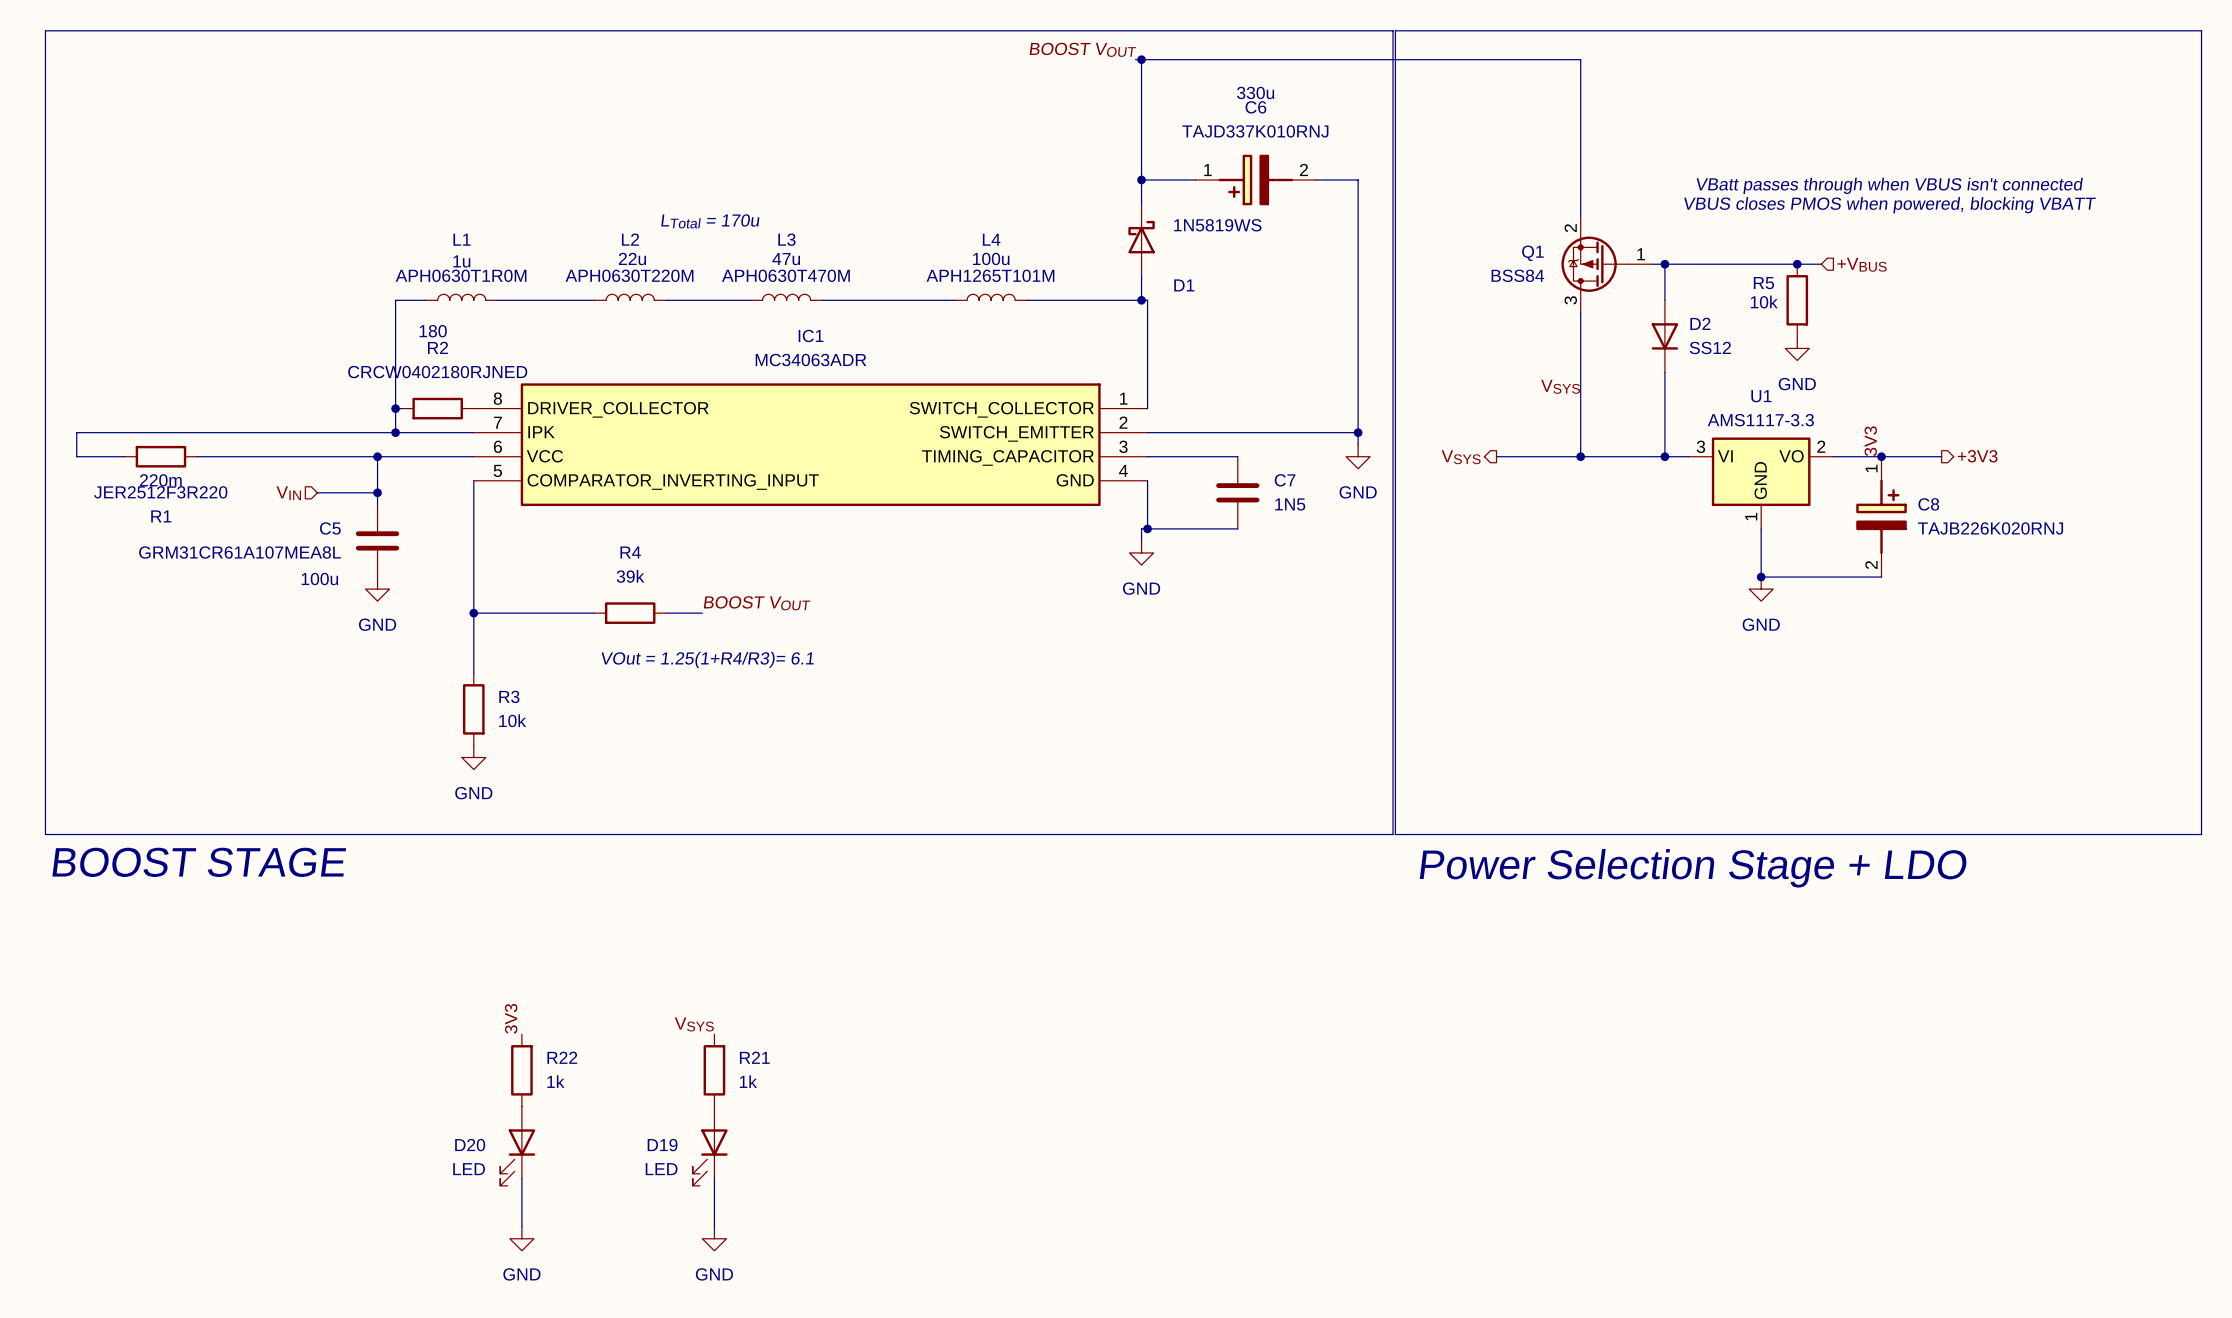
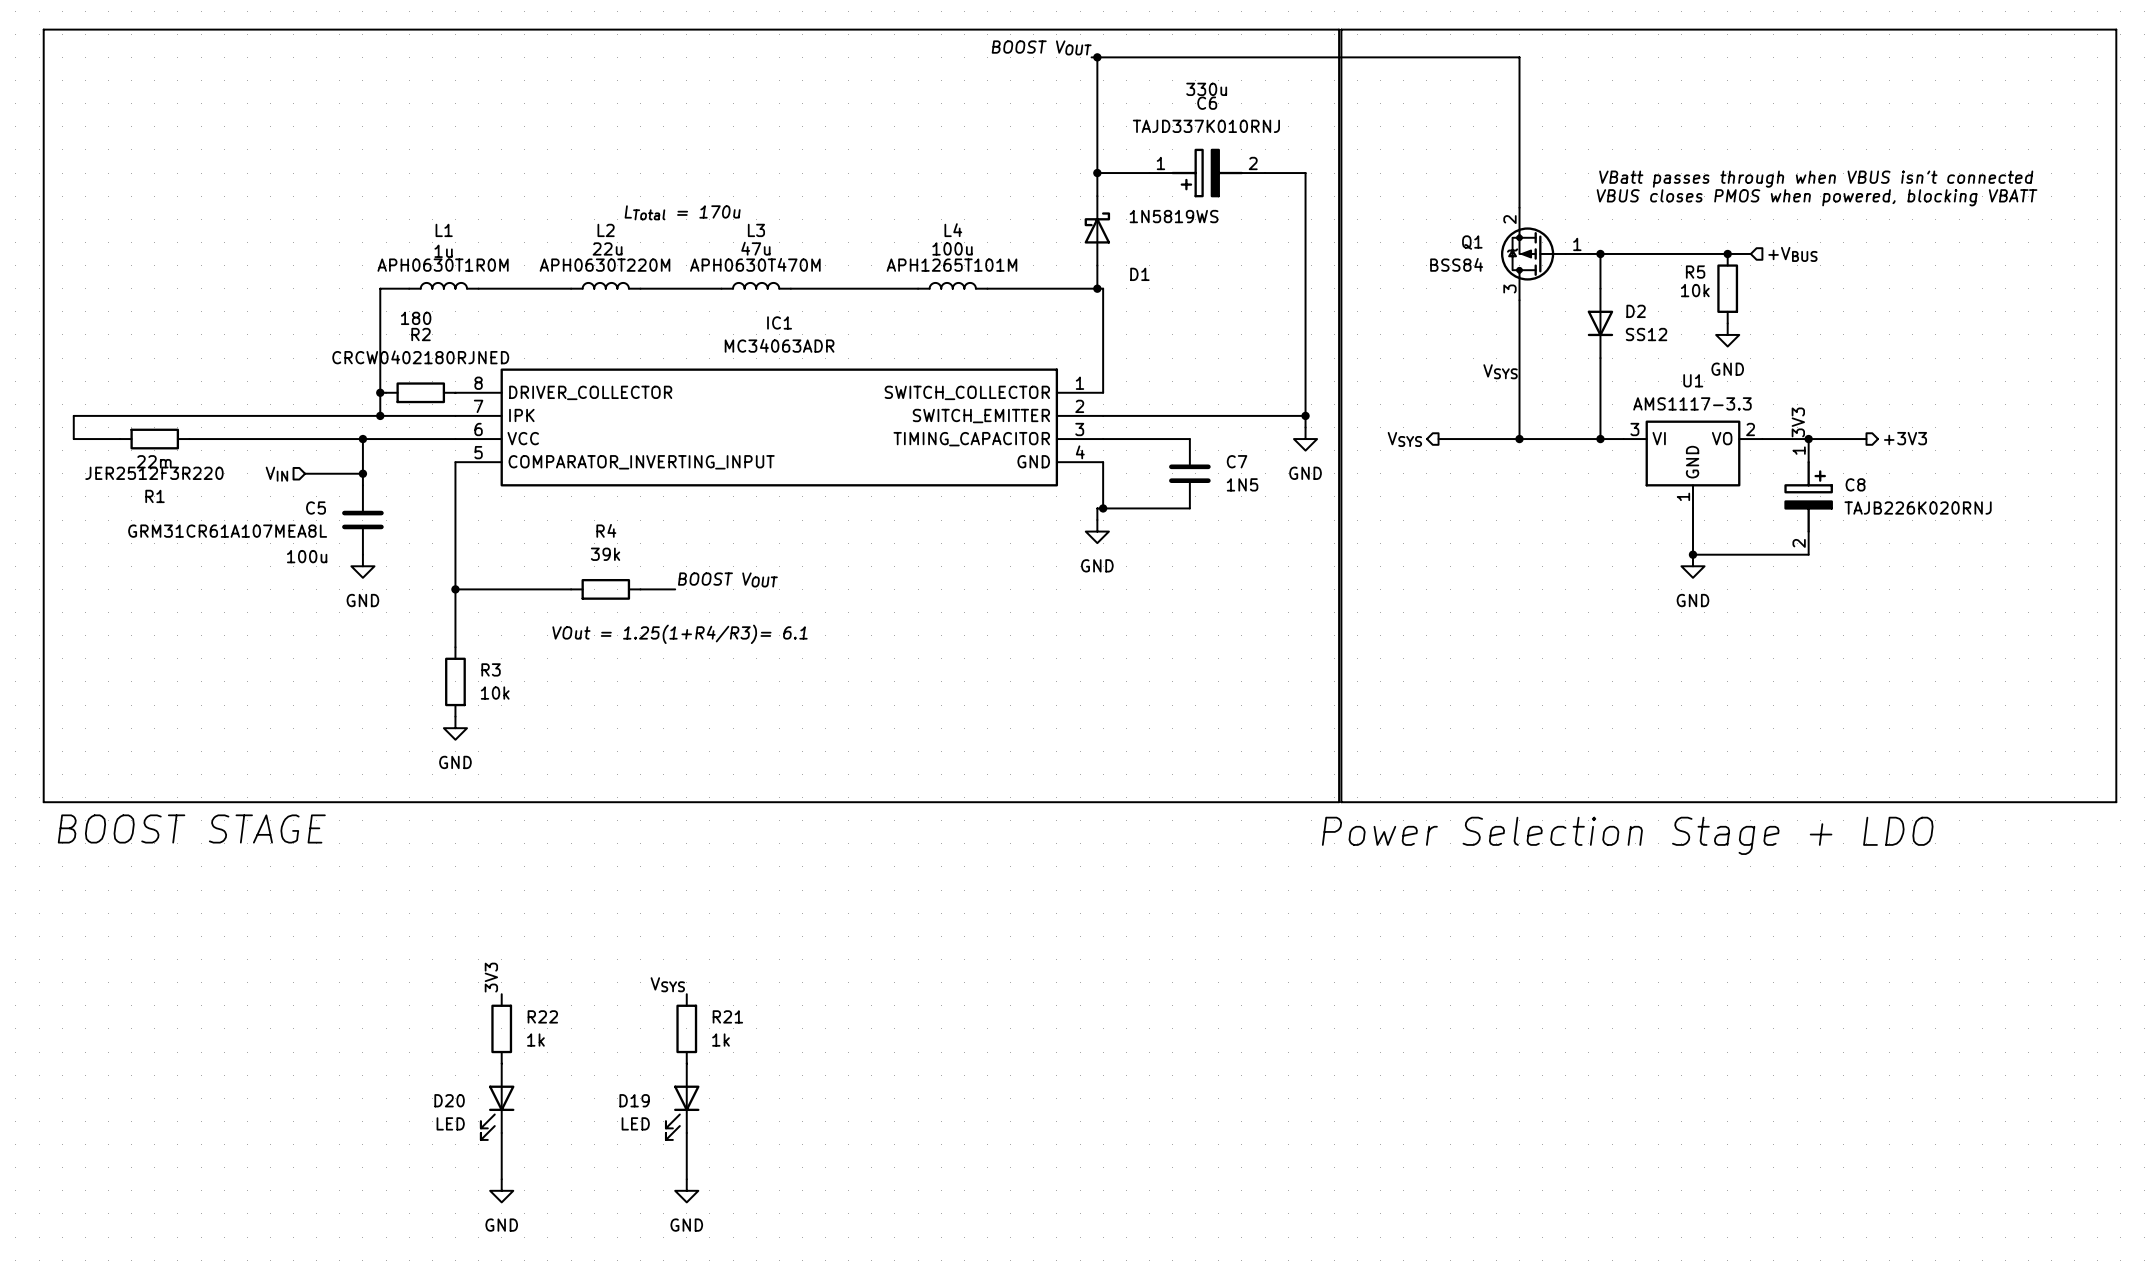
text: 220m (160, 480) -> 22m (154, 461)

